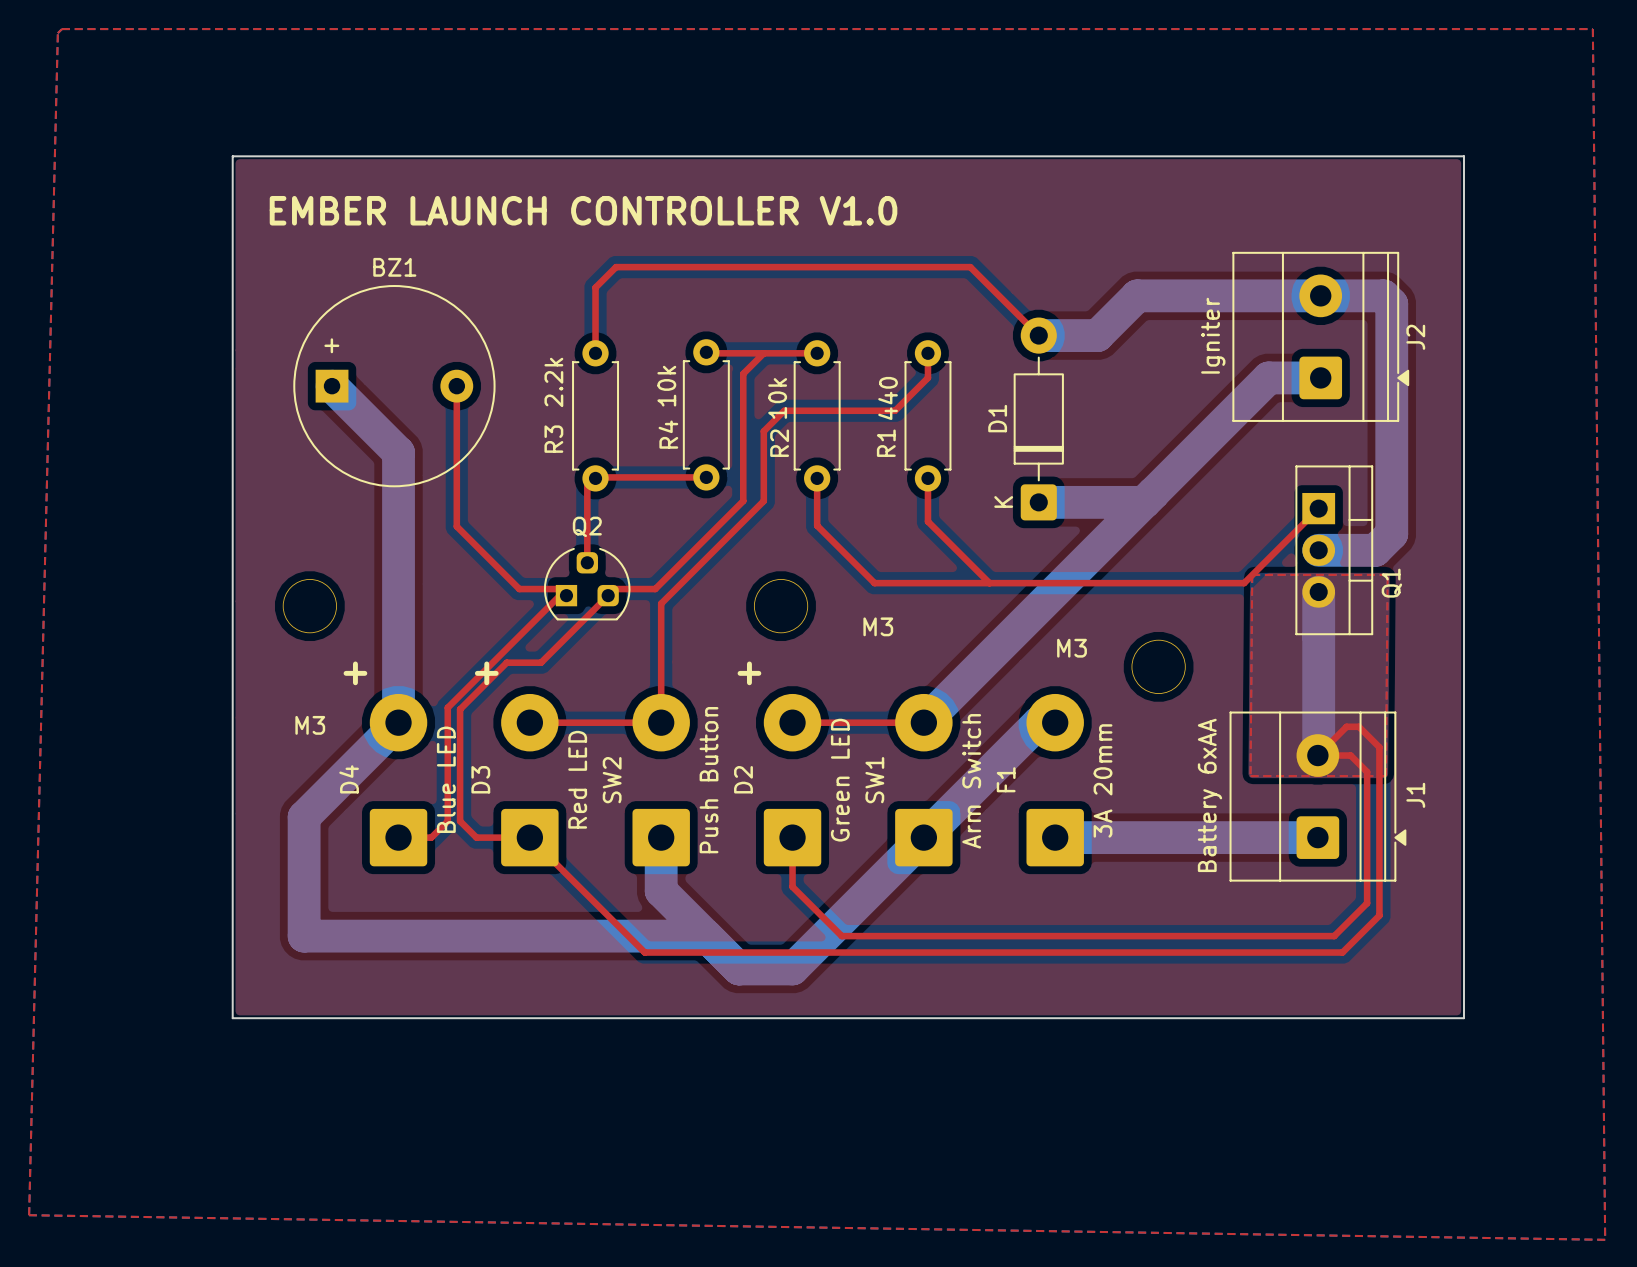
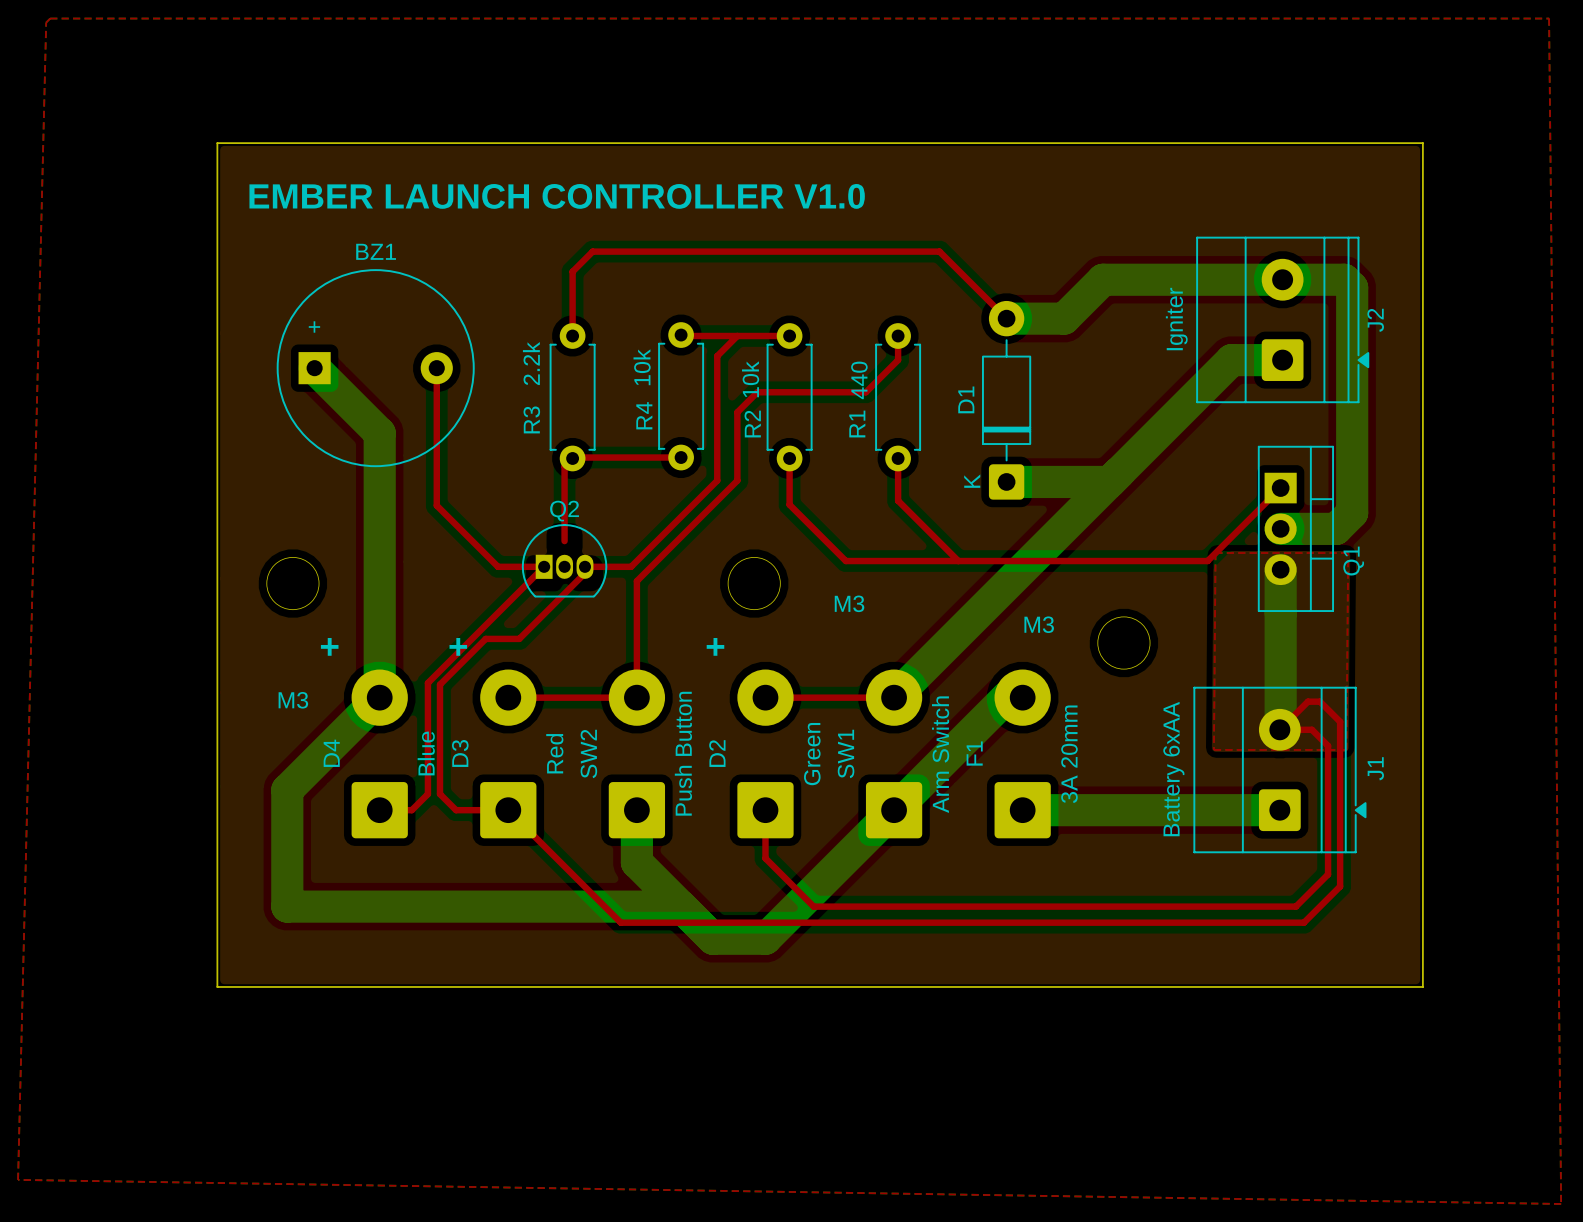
Q2 footprint: [543, 547, 631, 621] -> [521, 524, 608, 598]
D4 value: Blue LED (446, 779) -> Blue (426, 753)
D3 value: Red LED (577, 779) -> Red (554, 753)
D2 value: Green LED (840, 780) -> Green (812, 754)

